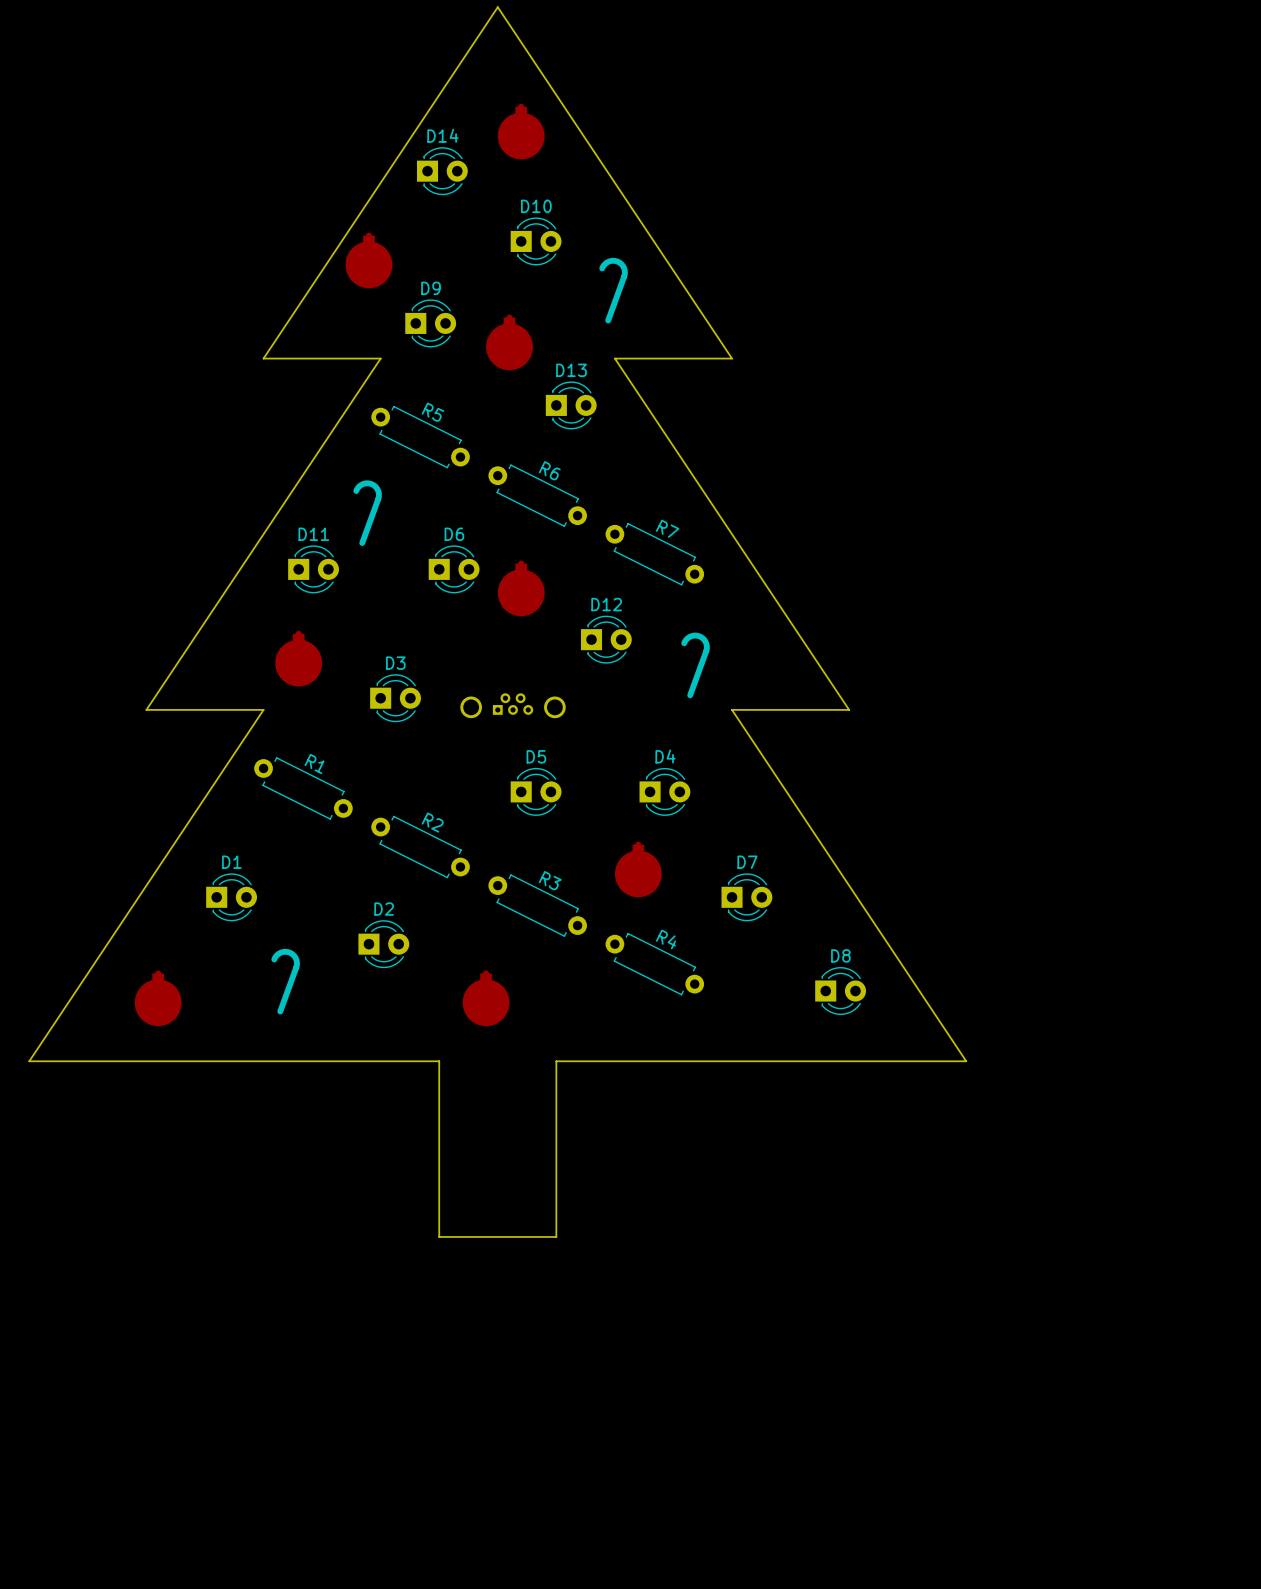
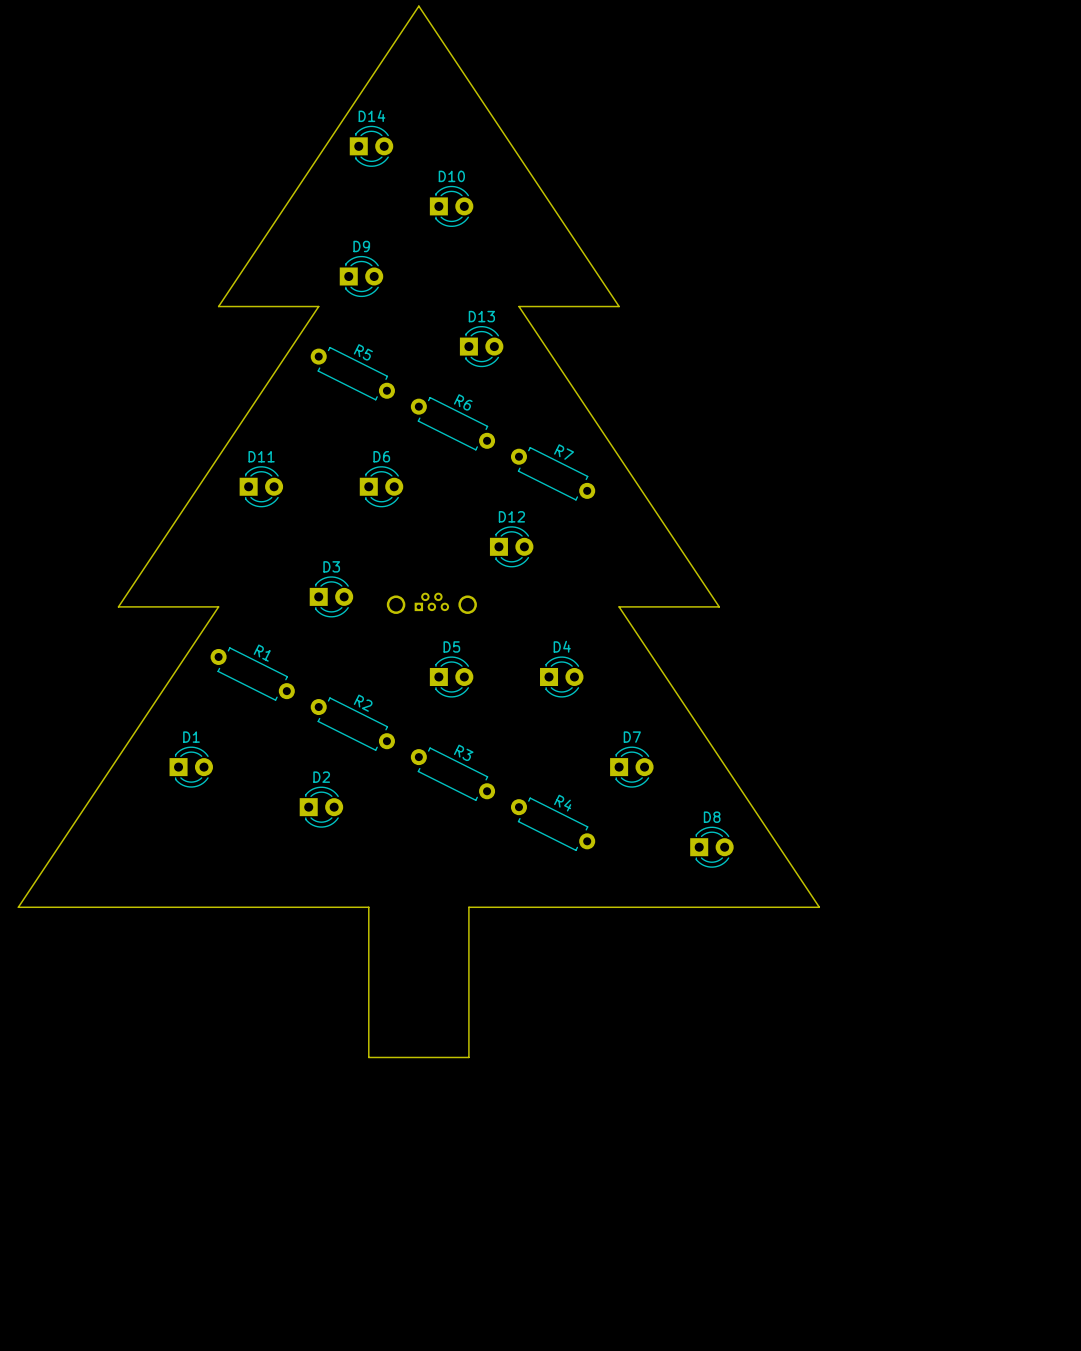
part: (521, 131) -> none
drawing: [599, 257, 628, 324] -> none
part: (368, 260) -> none
part: (509, 342) -> none
drawing: [353, 480, 382, 546] -> none
part: (521, 588) -> none
drawing: [681, 632, 710, 699] -> none
part: (298, 658) -> none
part: (638, 869) -> none
drawing: [271, 948, 300, 1015] -> none
part: (158, 998) -> none
part: (486, 998) -> none

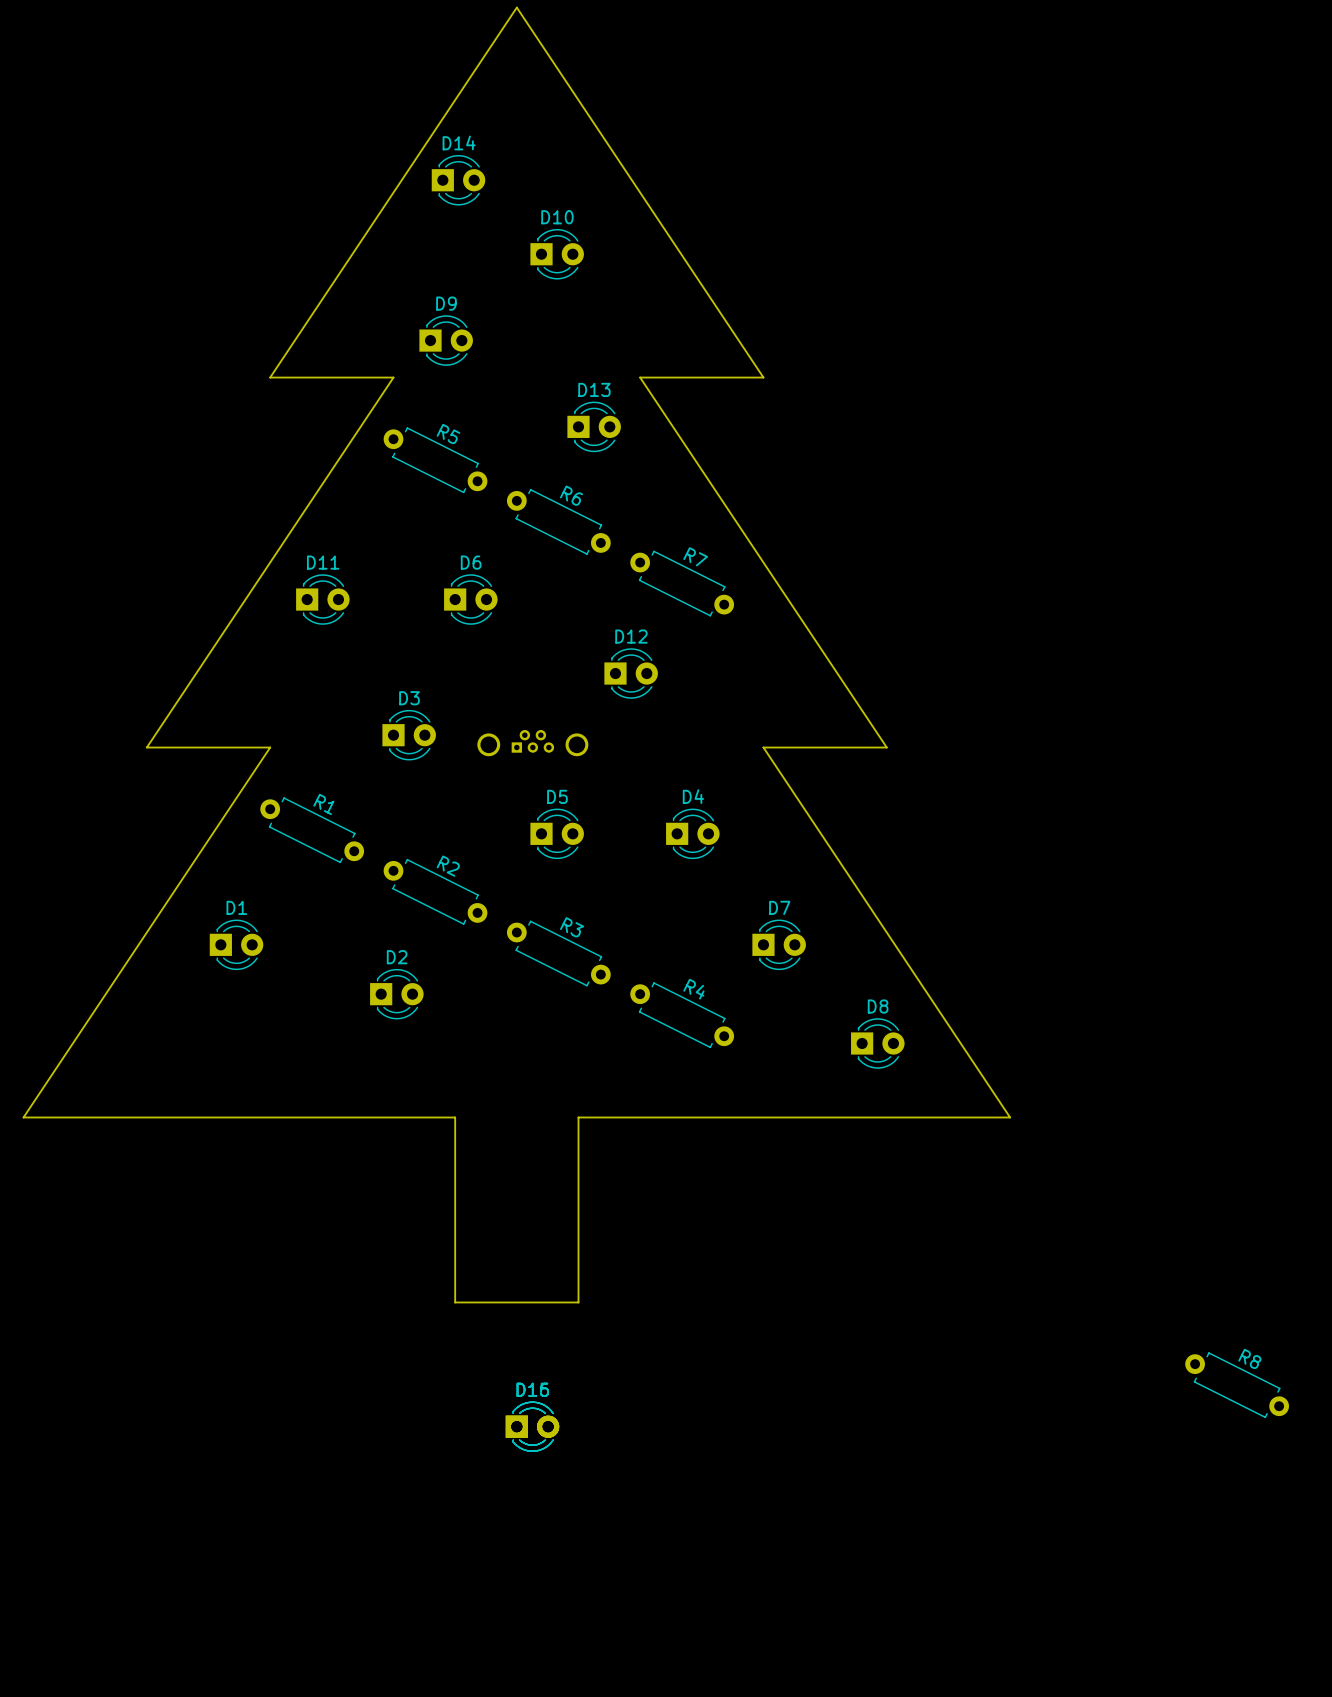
R8: none -> (1237, 1385)
part: none -> (532, 1426)
part: none -> (532, 1426)

